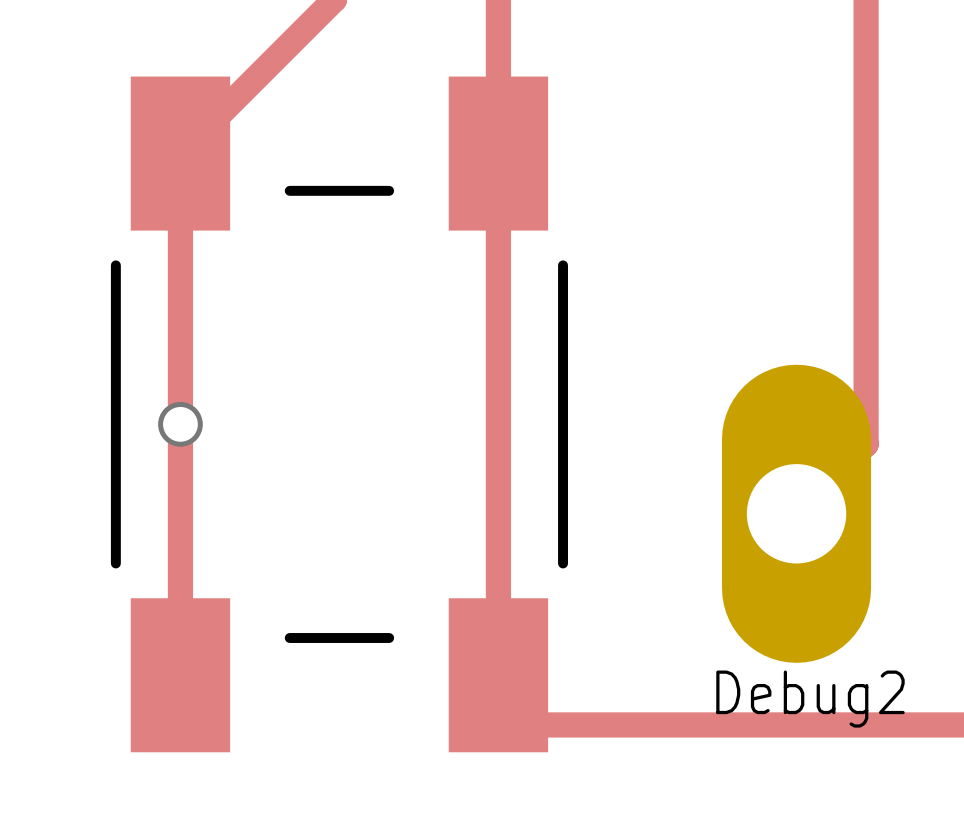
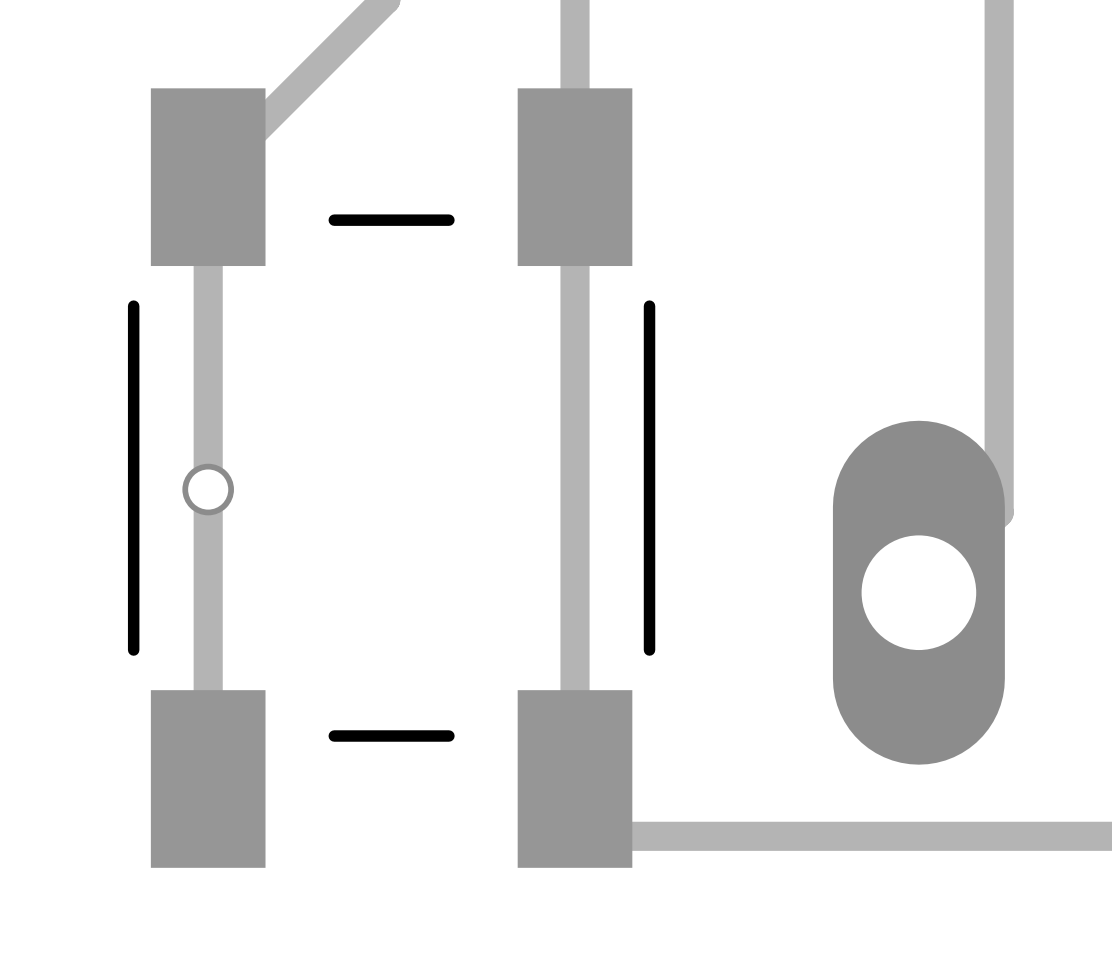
text: Debug2 (810, 699) -> none

